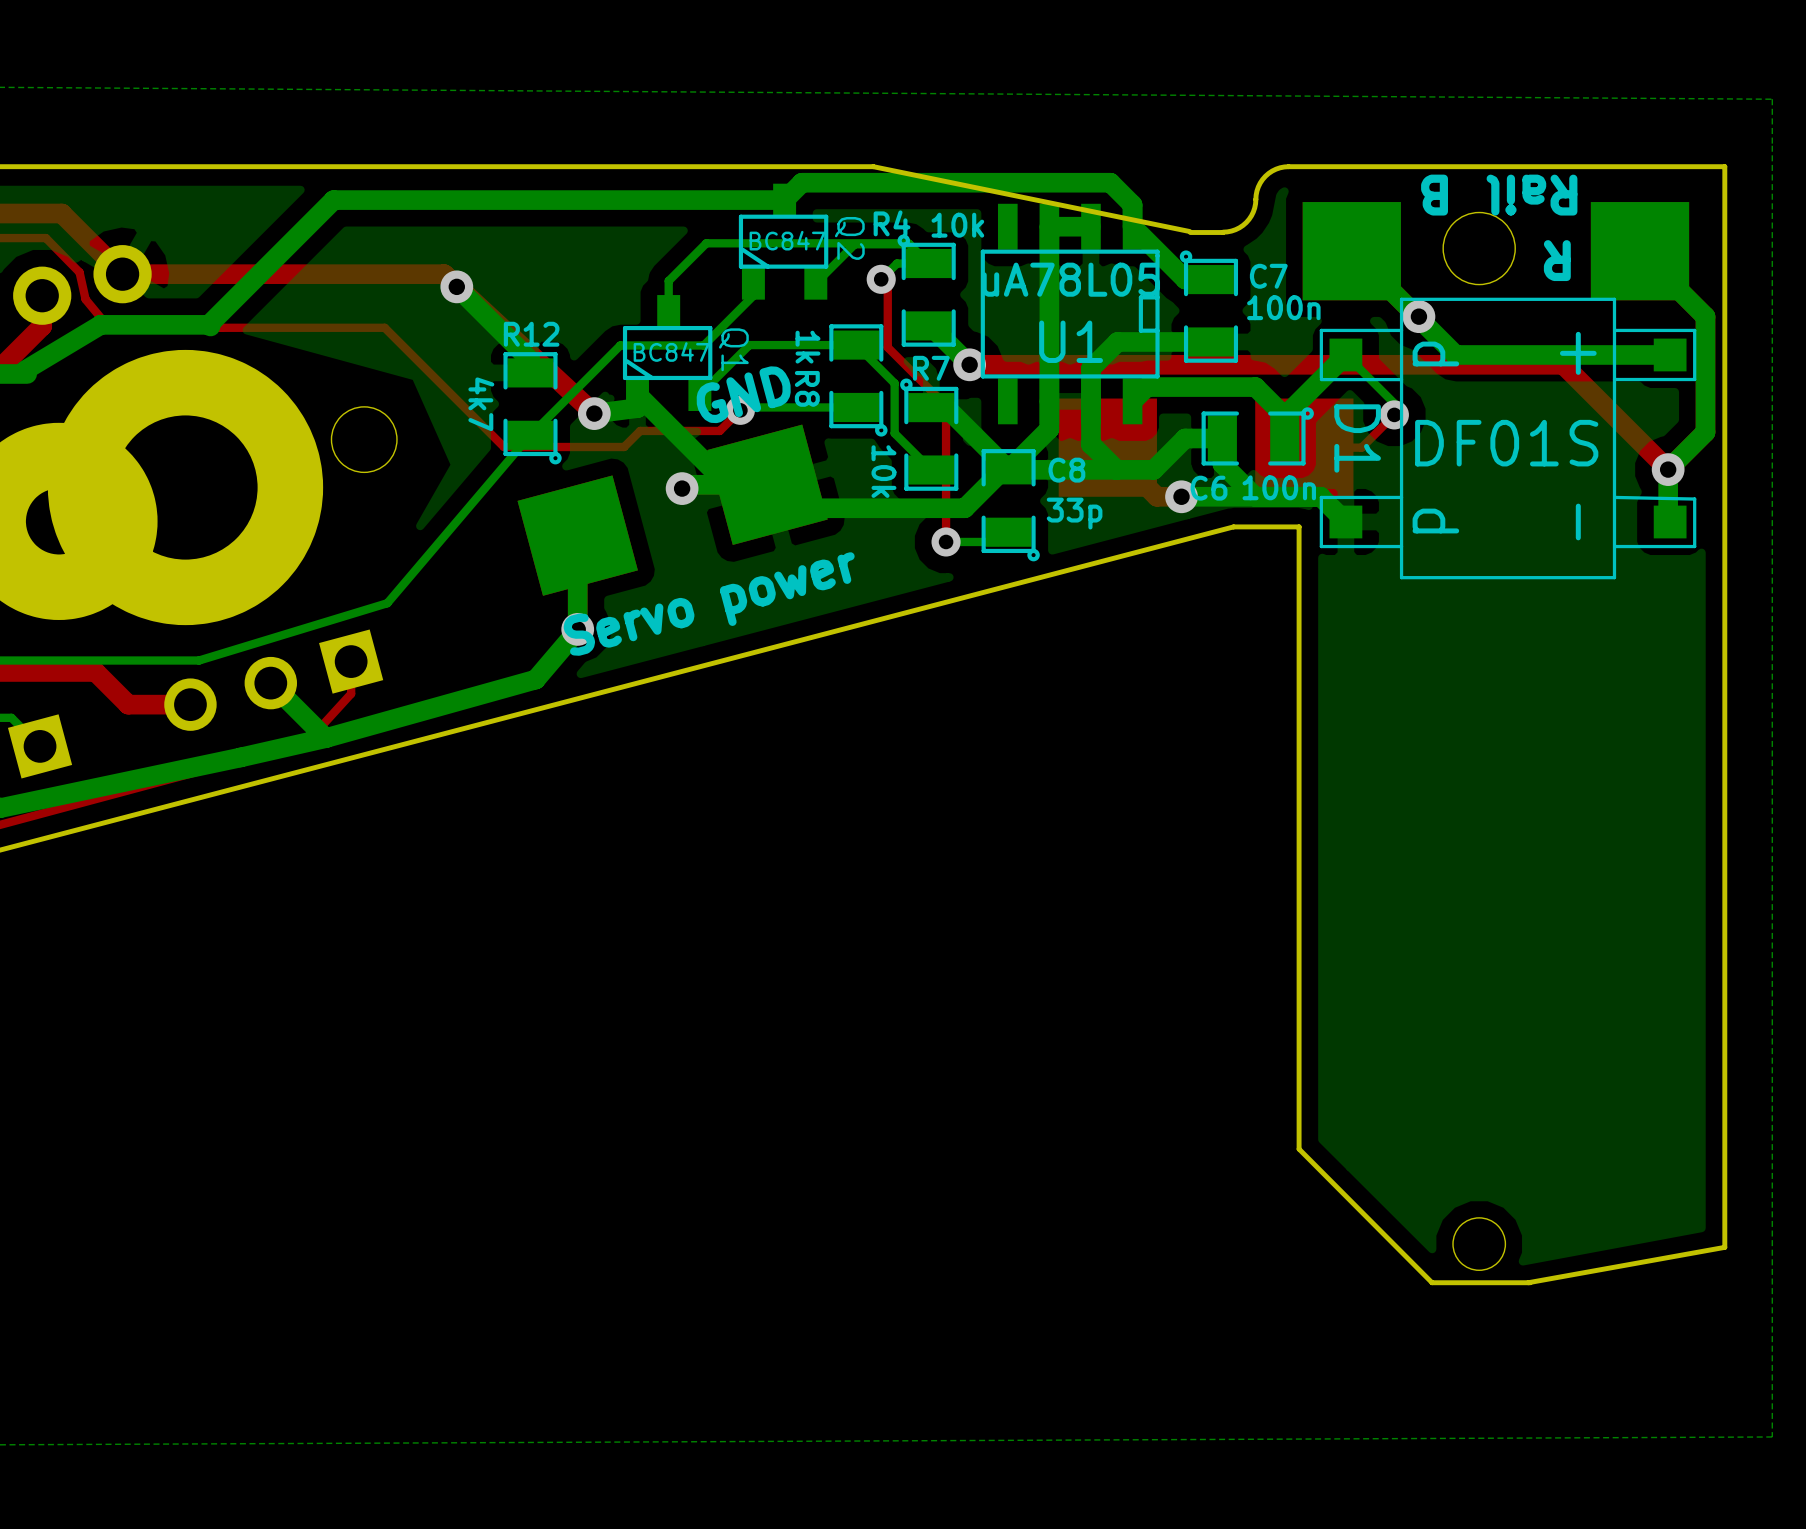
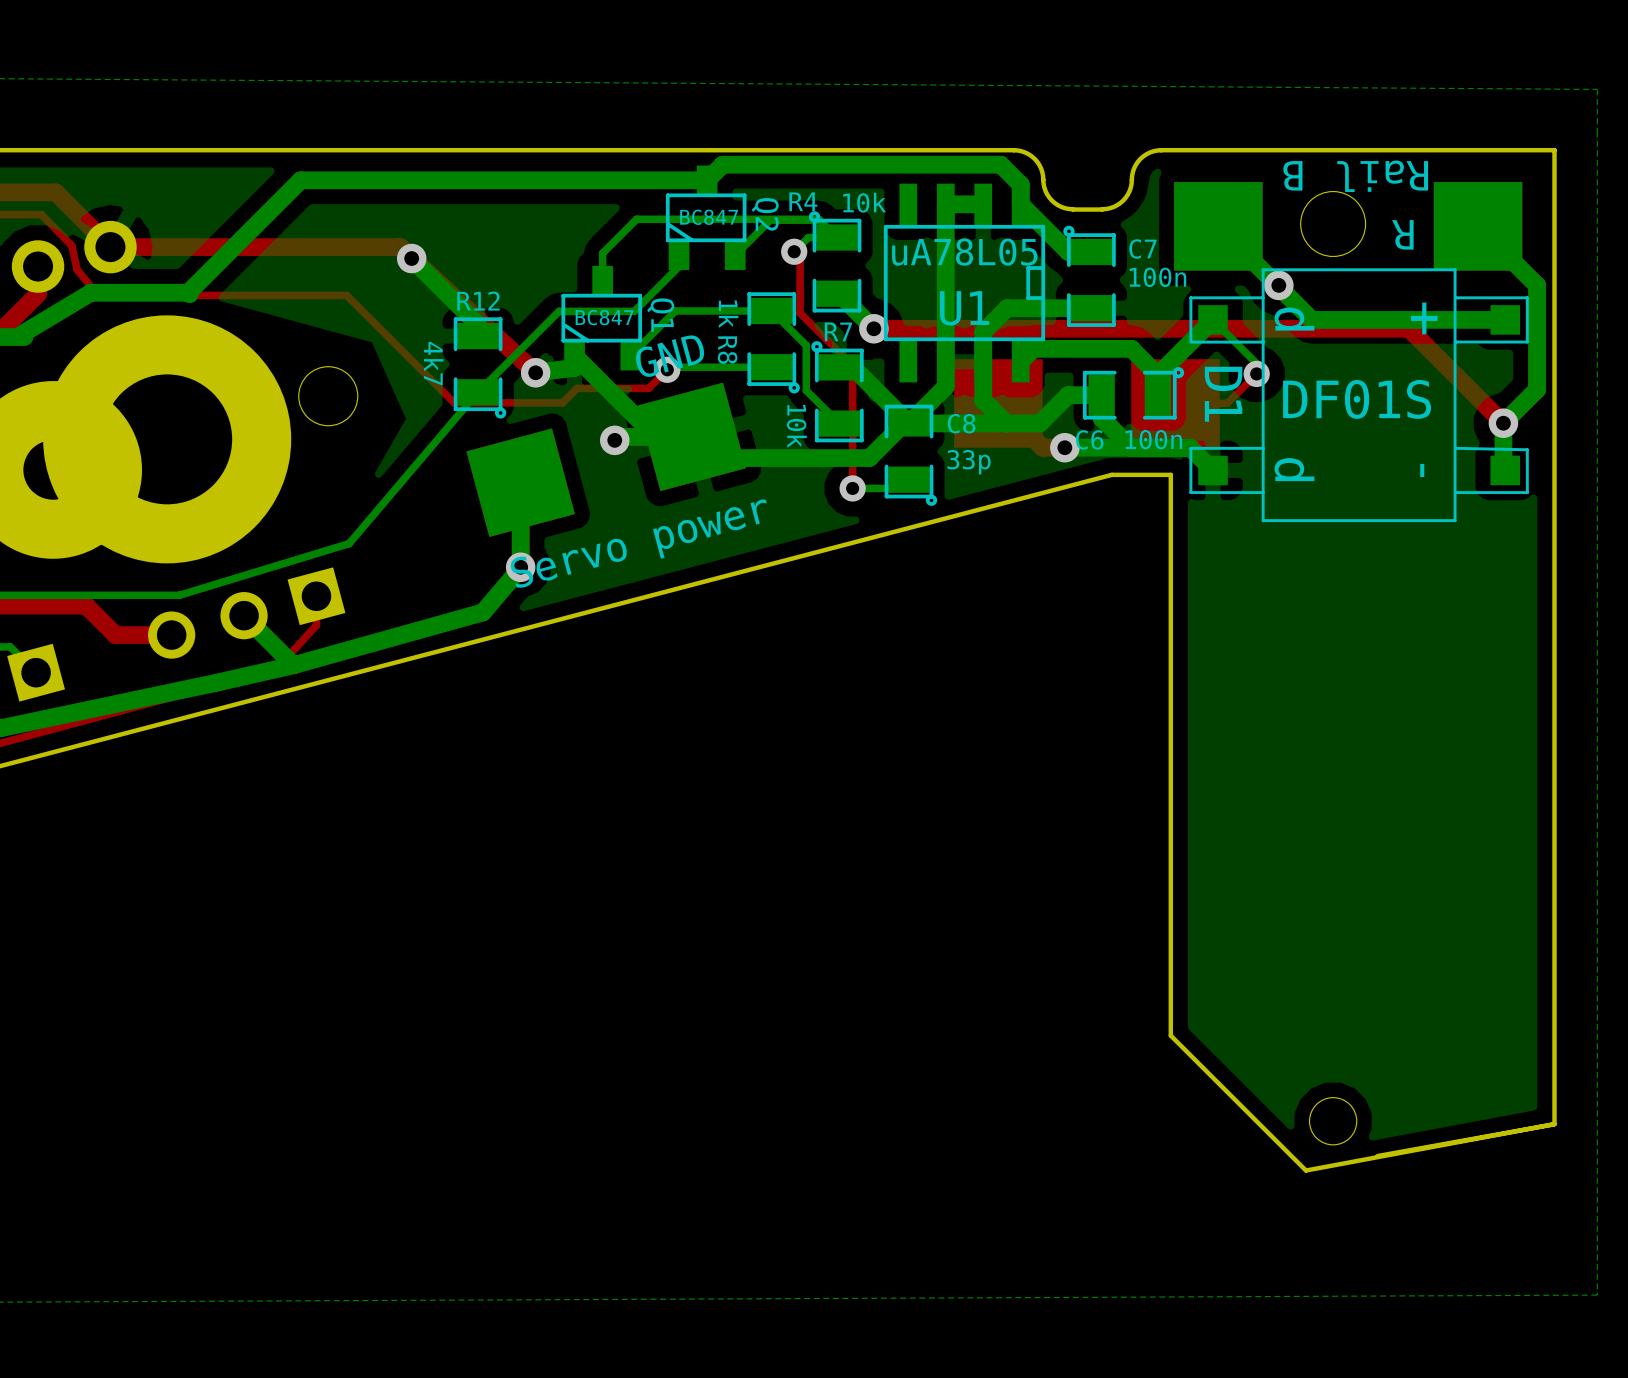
board edge: (873, 166) (1189, 231) -> (787, 150) (1021, 151) (1031, 156) (1039, 164) (1045, 191) (1051, 200) (1061, 207) (1072, 209)
board edge: (1299, 1149) (1432, 1282) (1530, 1282) -> (1170, 1035) (1305, 1170) (1554, 1124)

